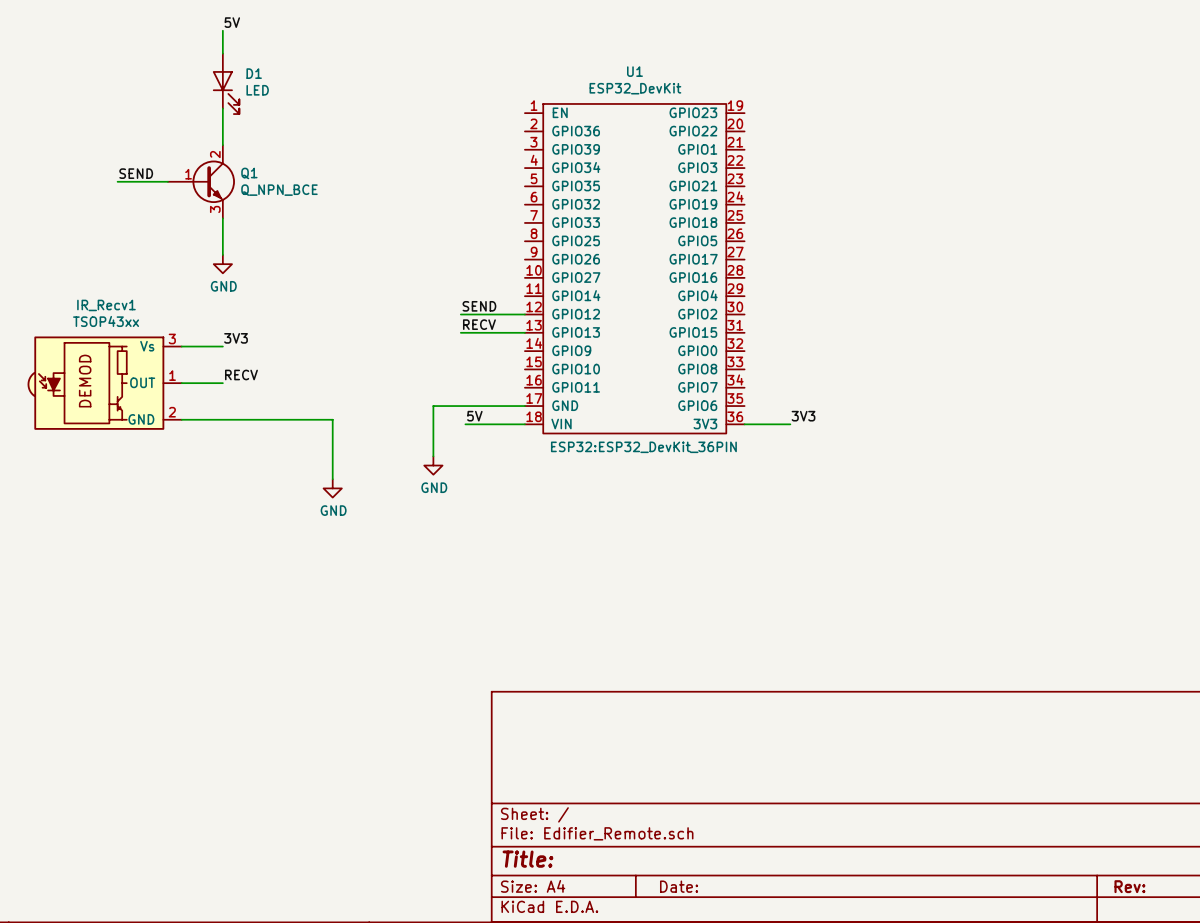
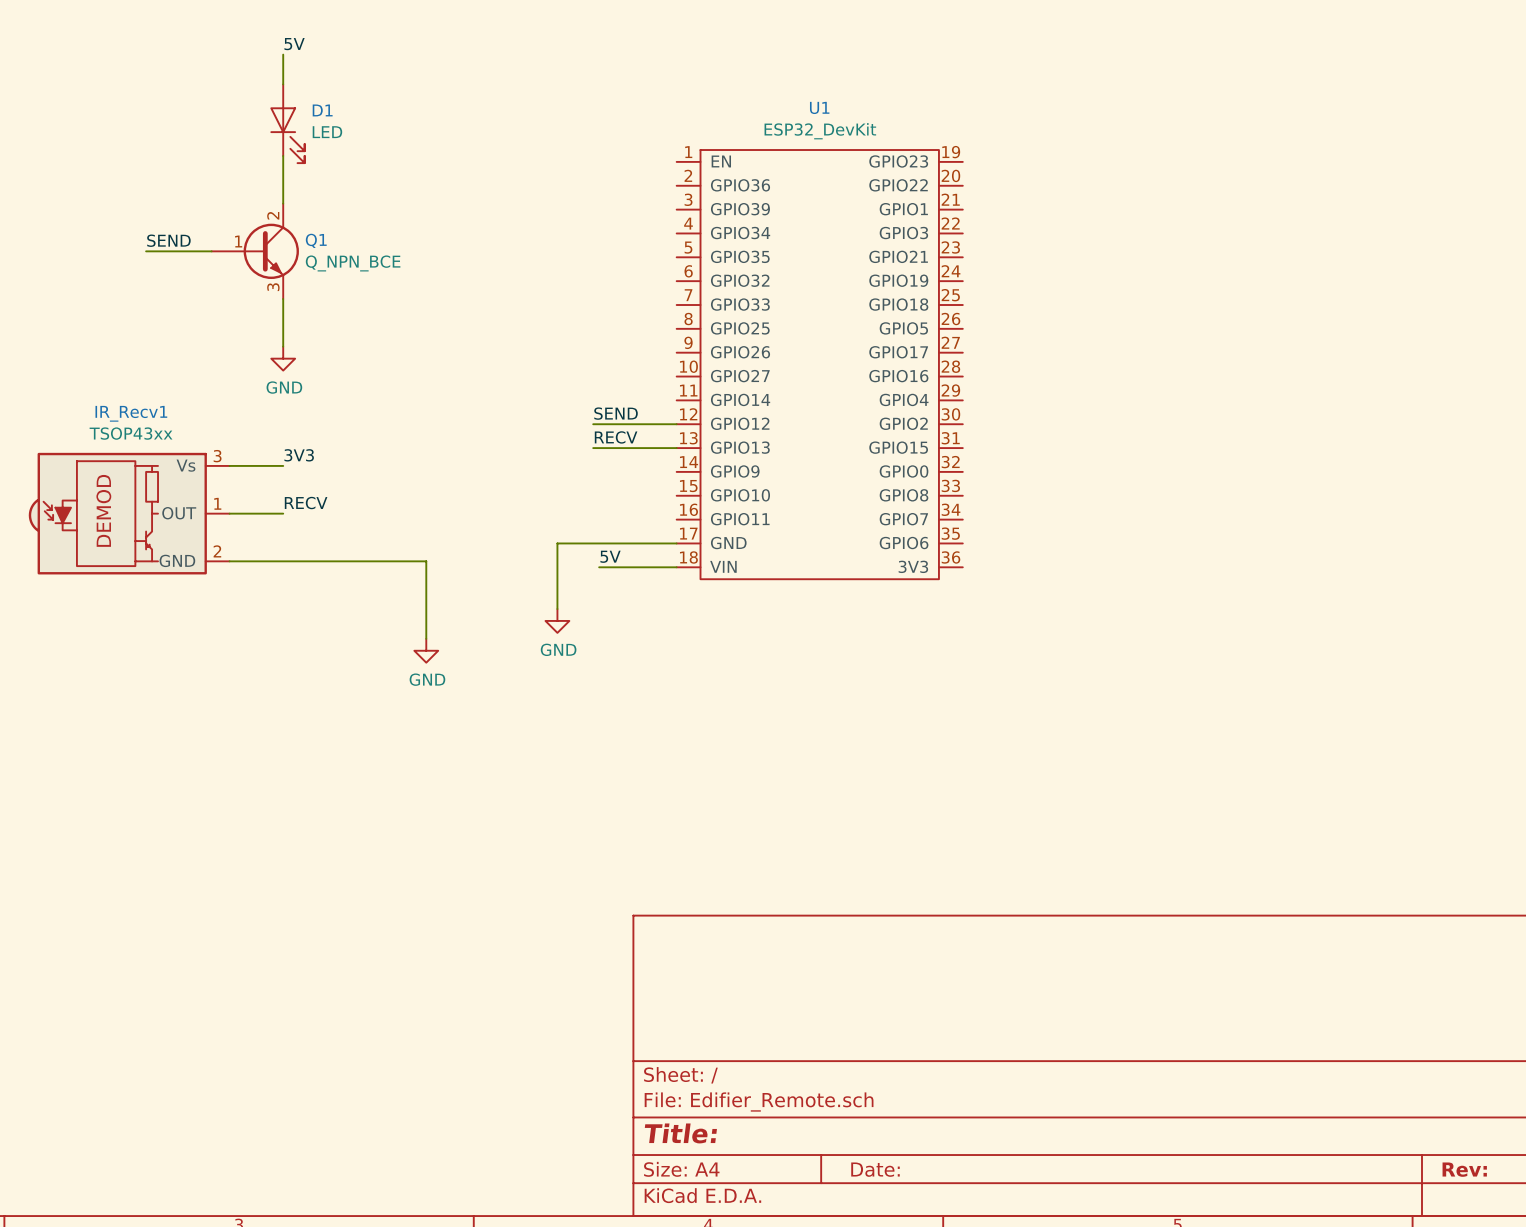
label: 3V3 (803, 416) -> none
wire: (744, 424) (790, 424) -> none
U1 text: ESP32:ESP32_DevKit_36PIN (643, 447) -> none

